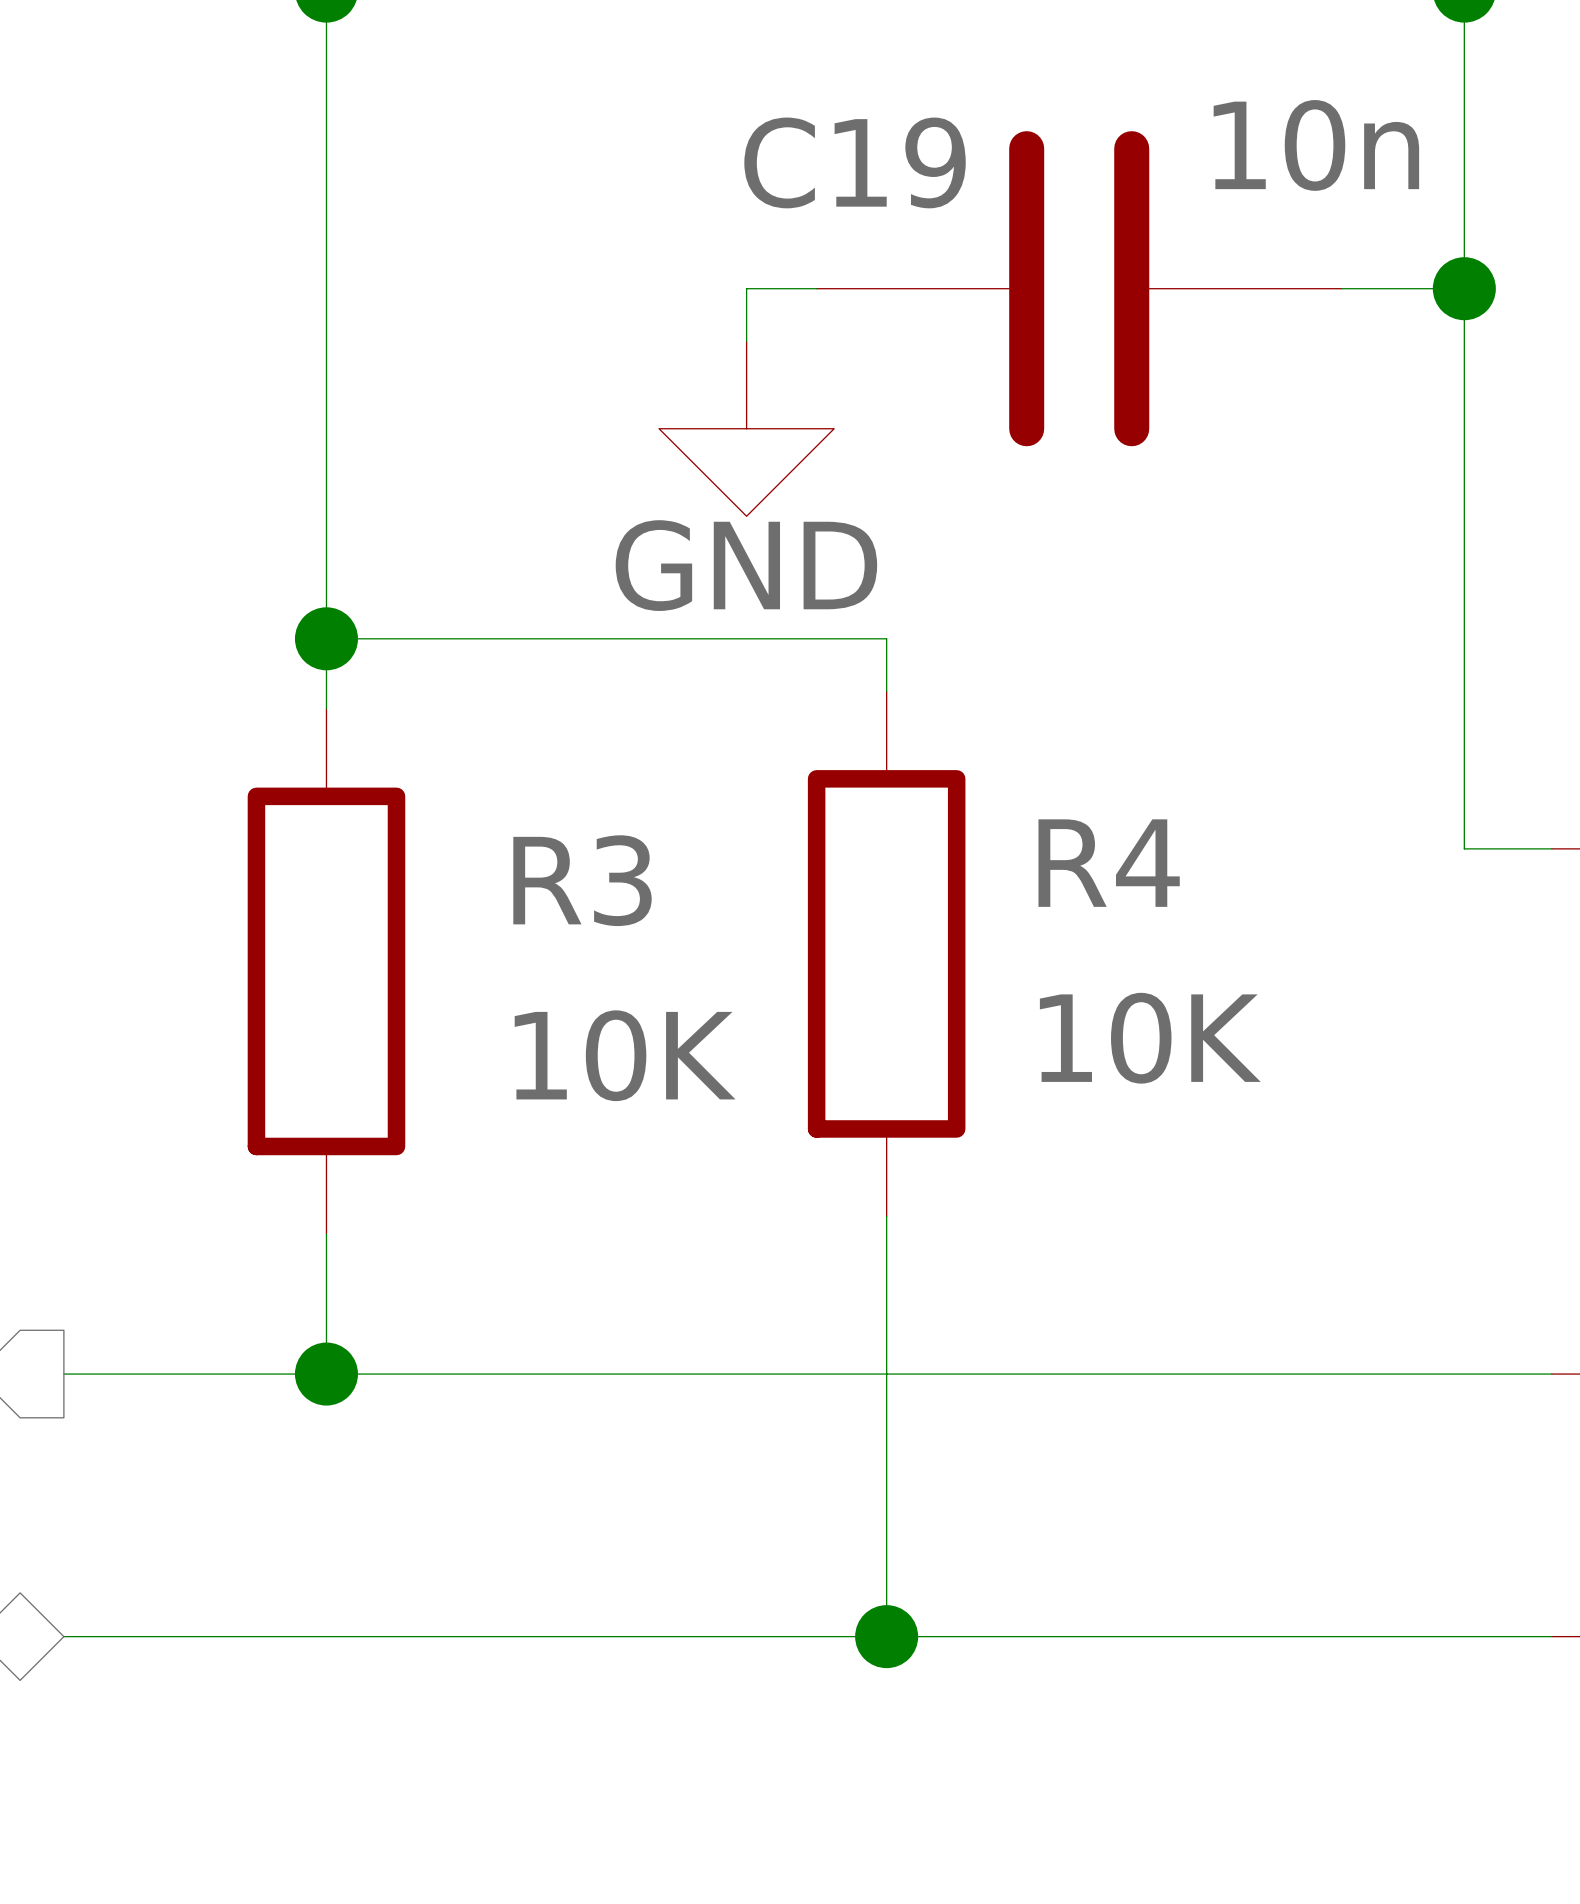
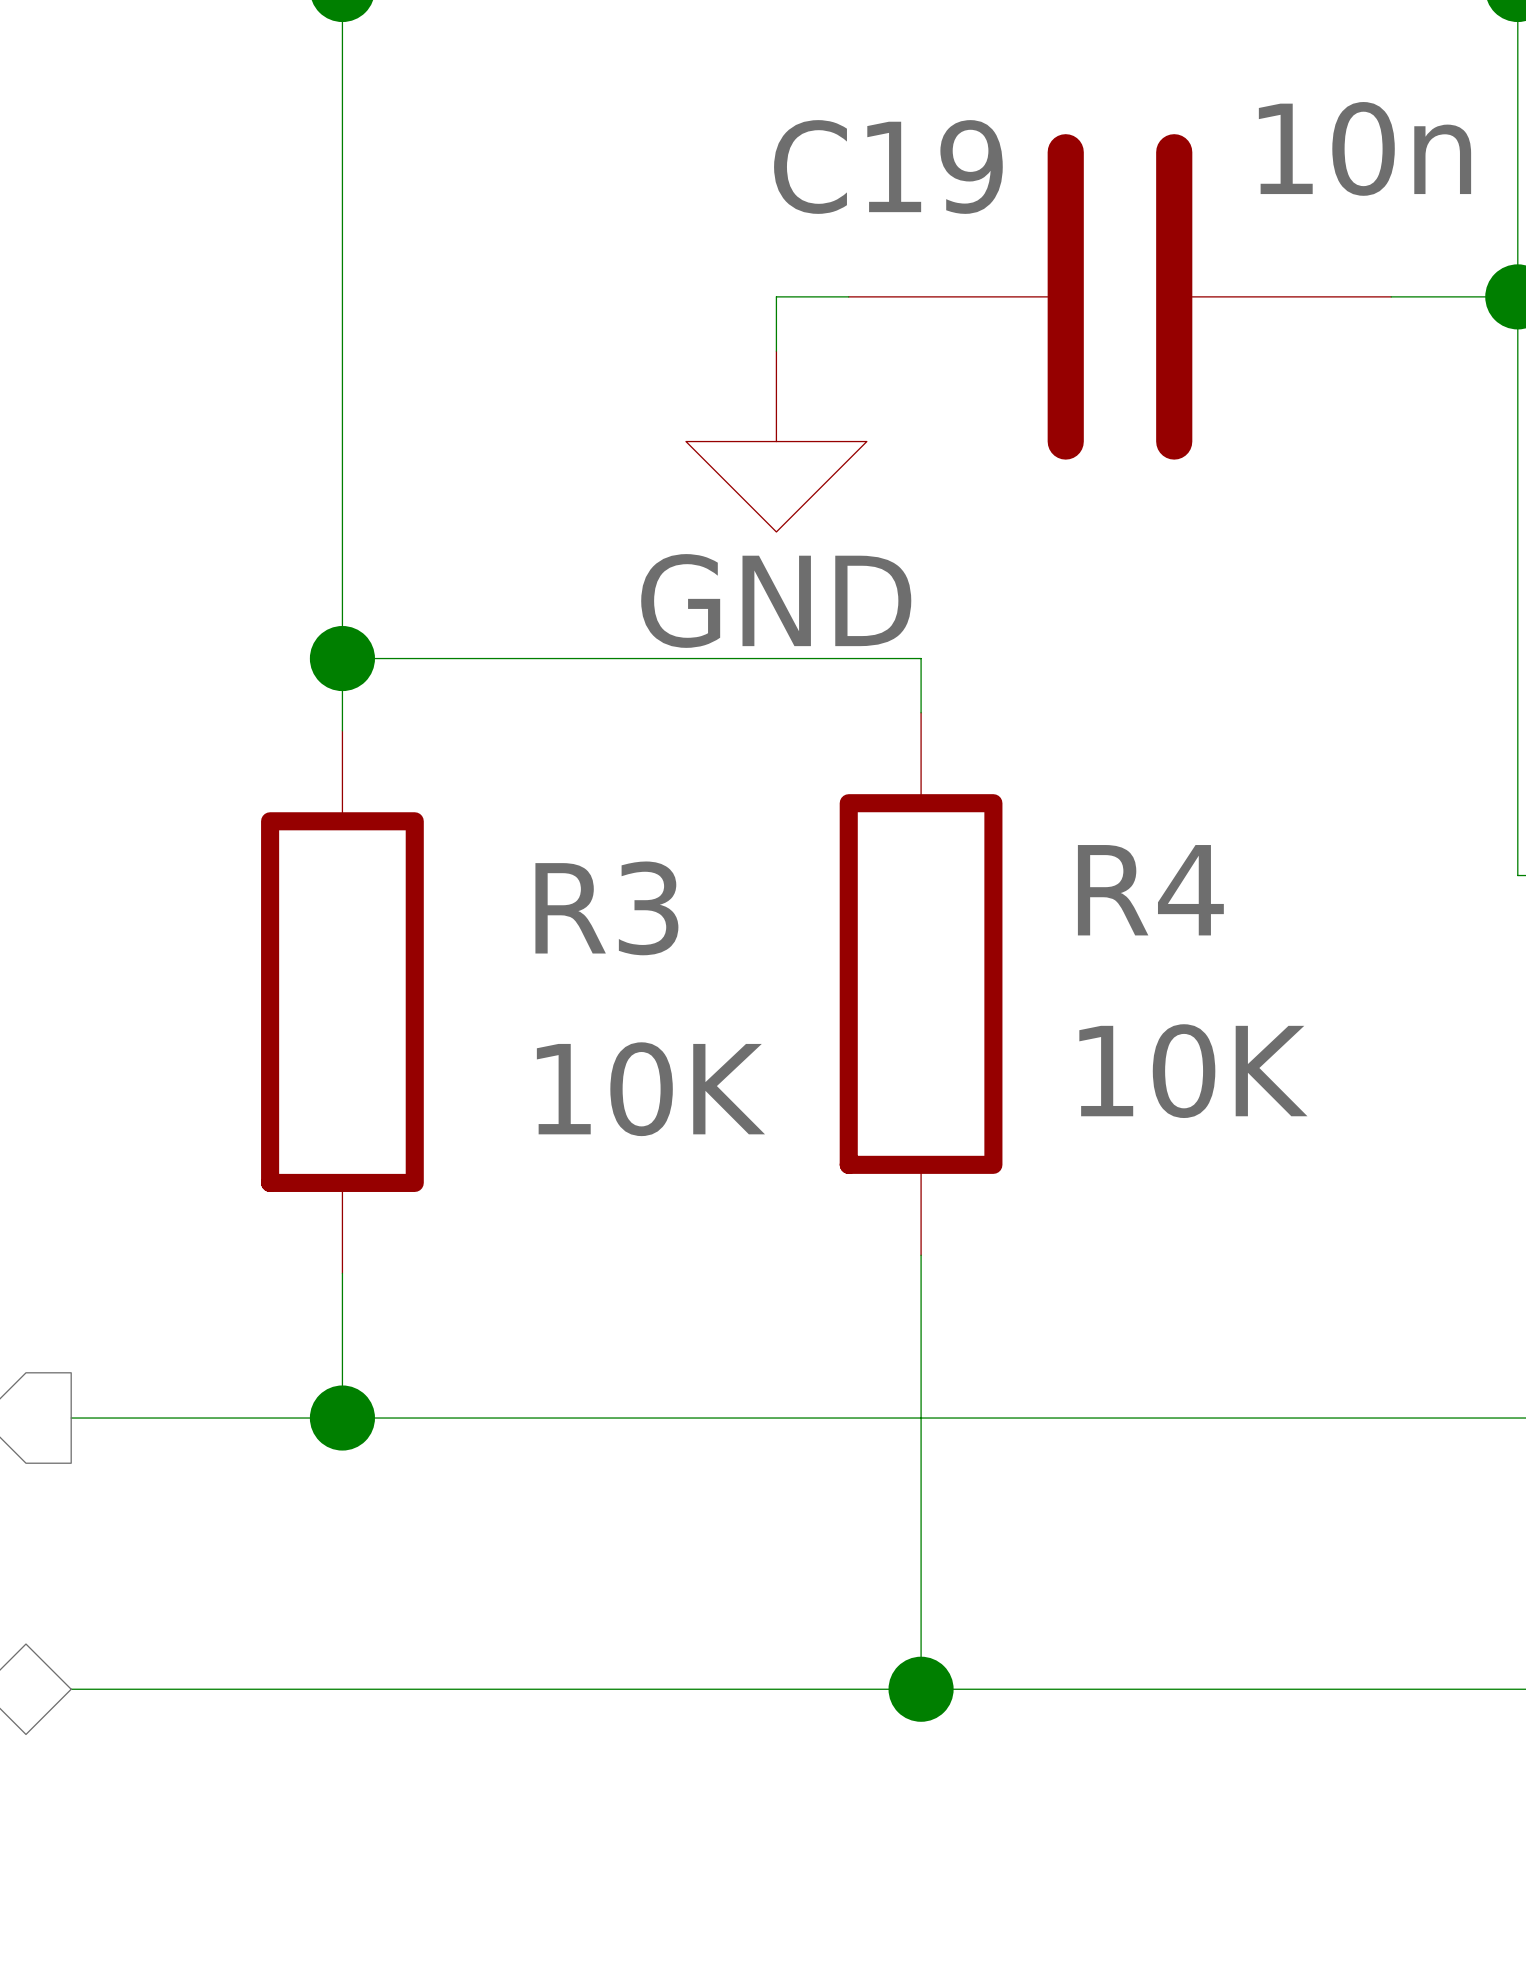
power symbol text position: GND (746, 565) -> GND (776, 600)

